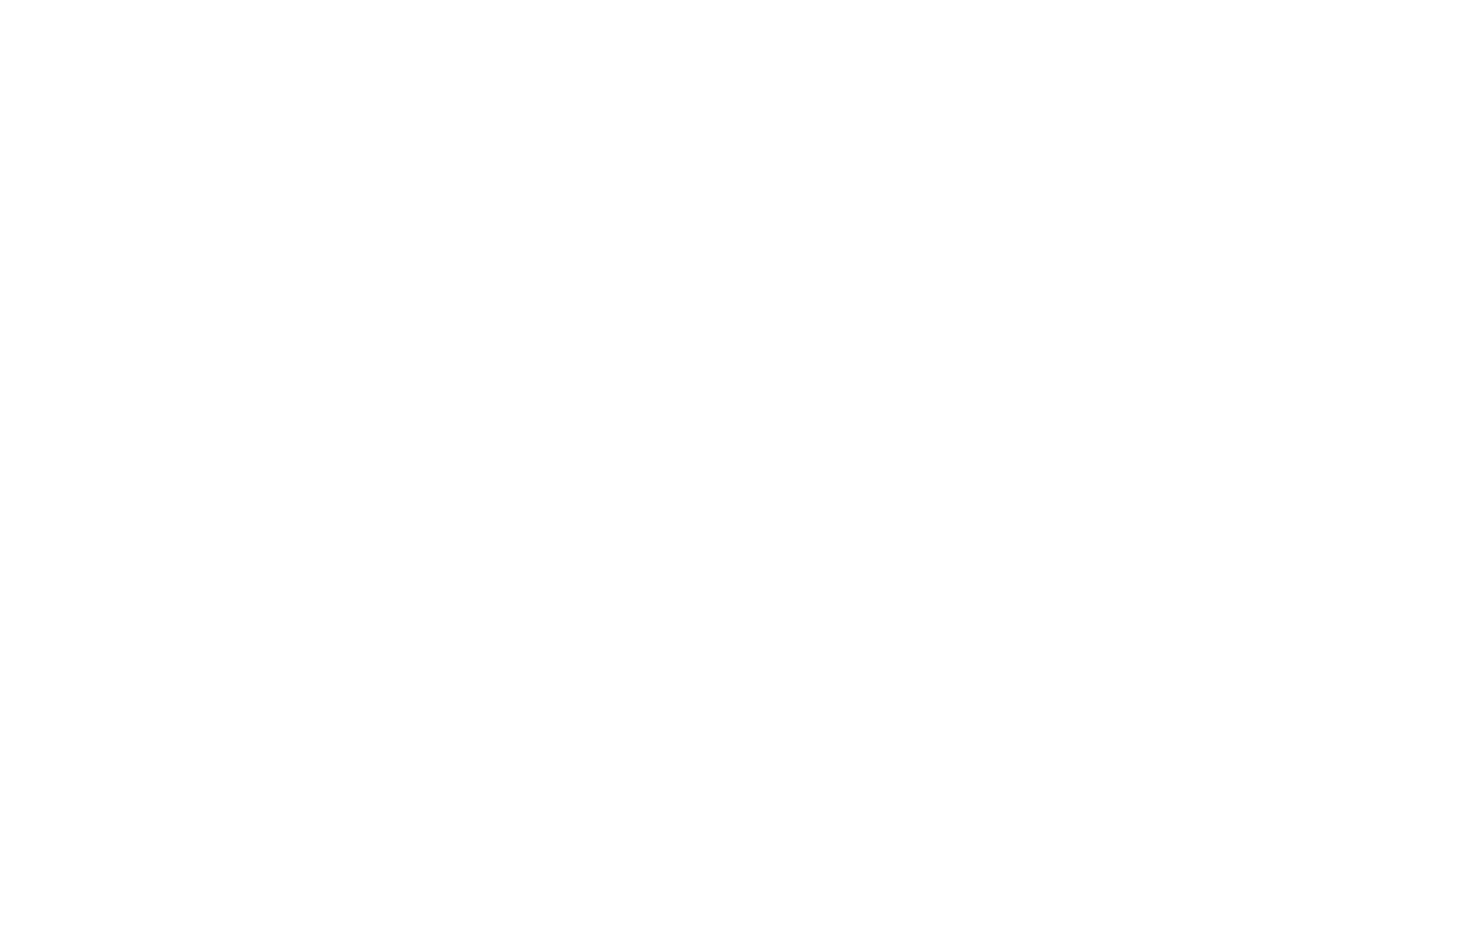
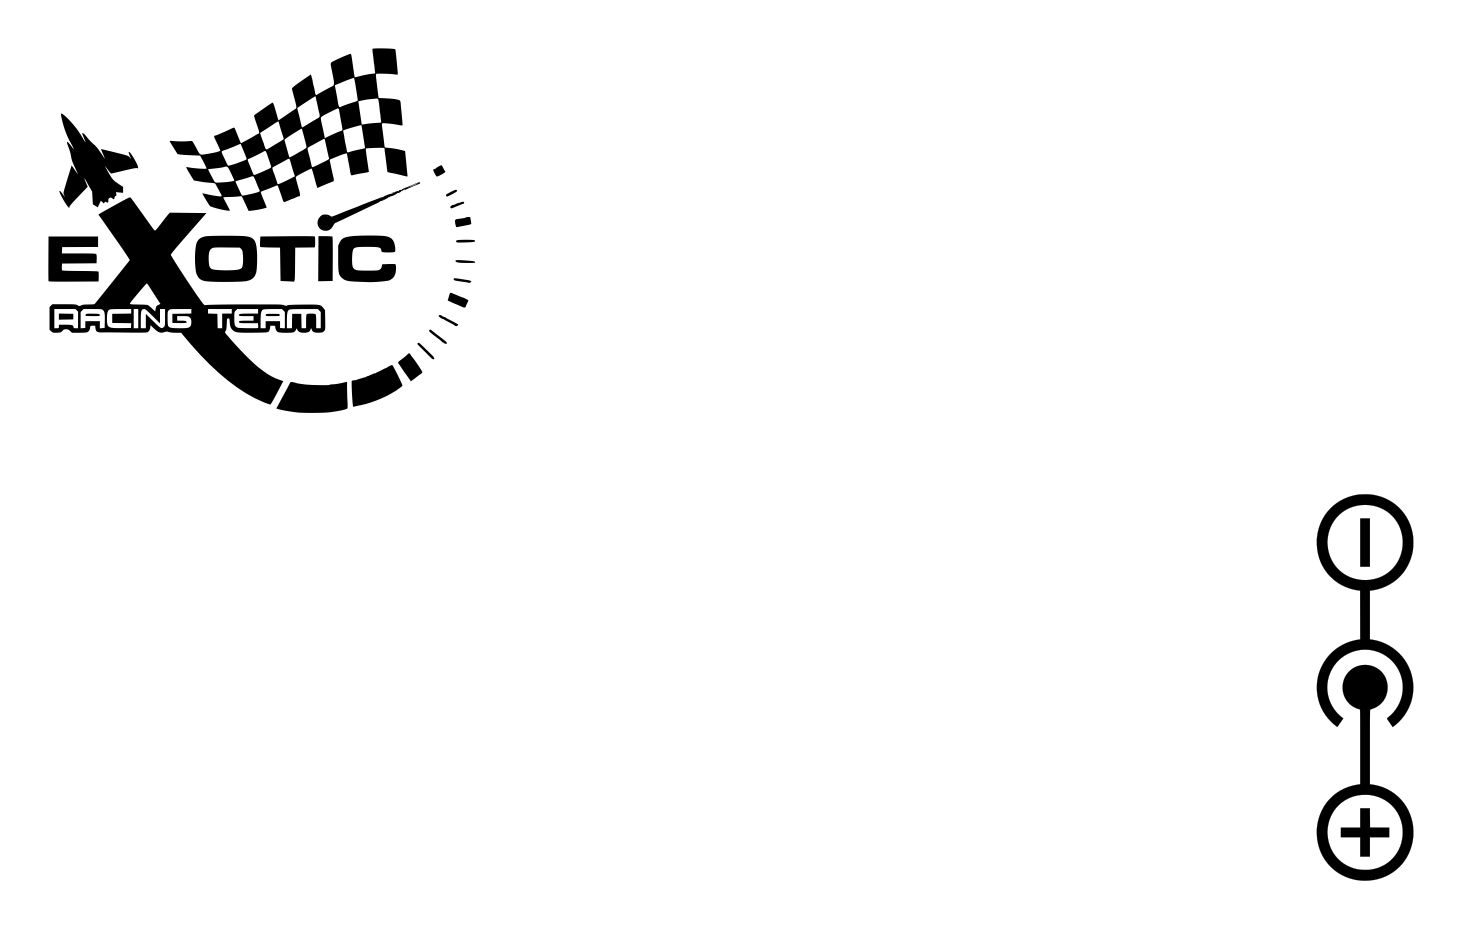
drawing: none -> [48, 48, 476, 413]
drawing: none -> [1316, 494, 1414, 881]

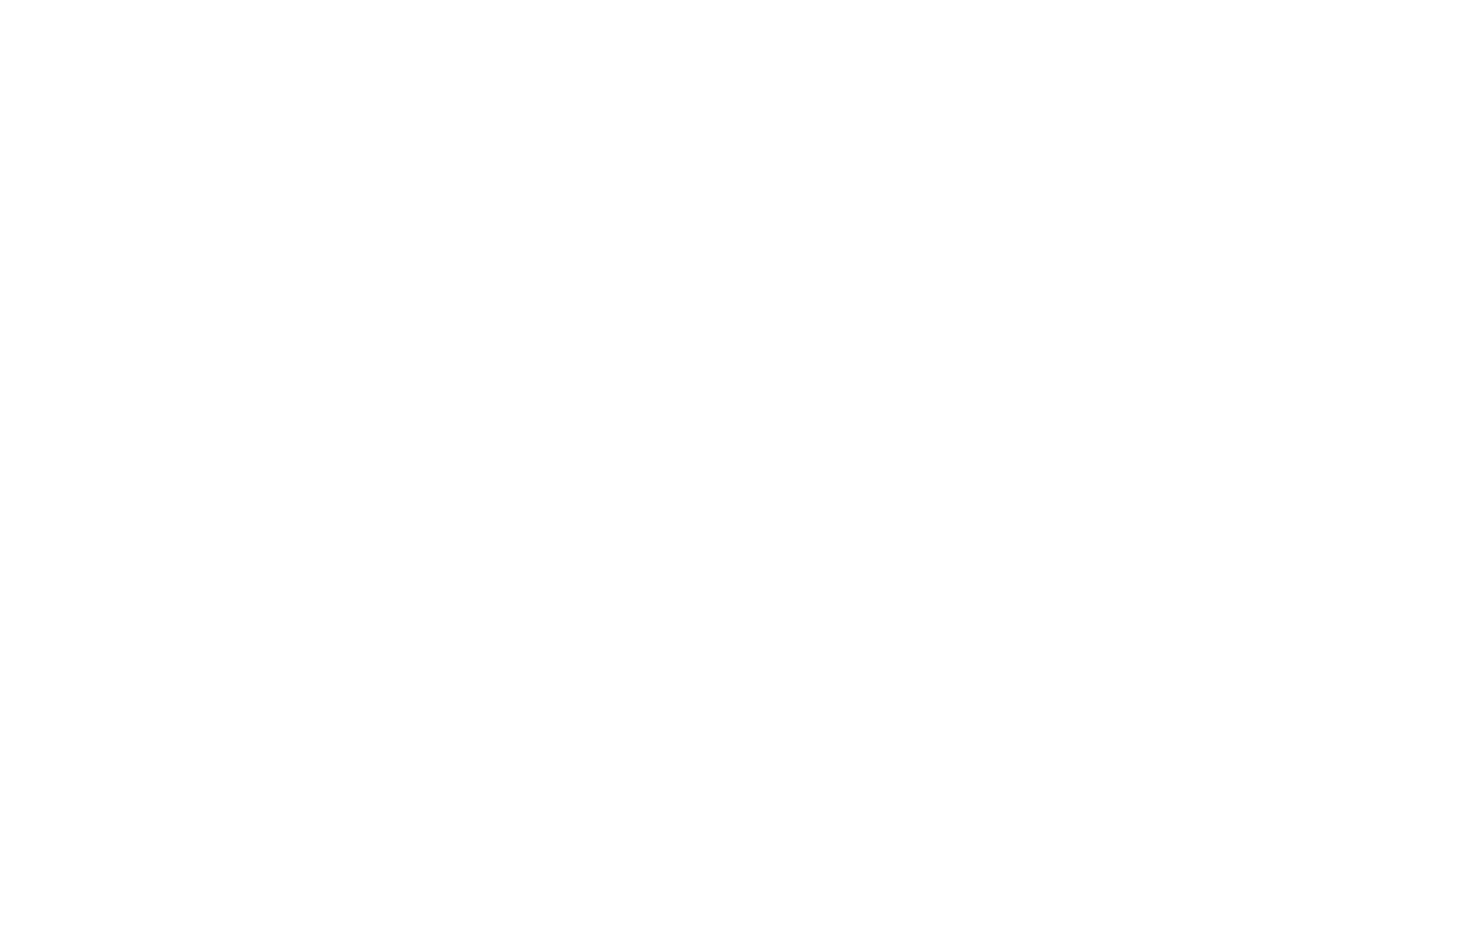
drawing: [48, 48, 476, 413] -> none
drawing: [1316, 494, 1414, 881] -> none

